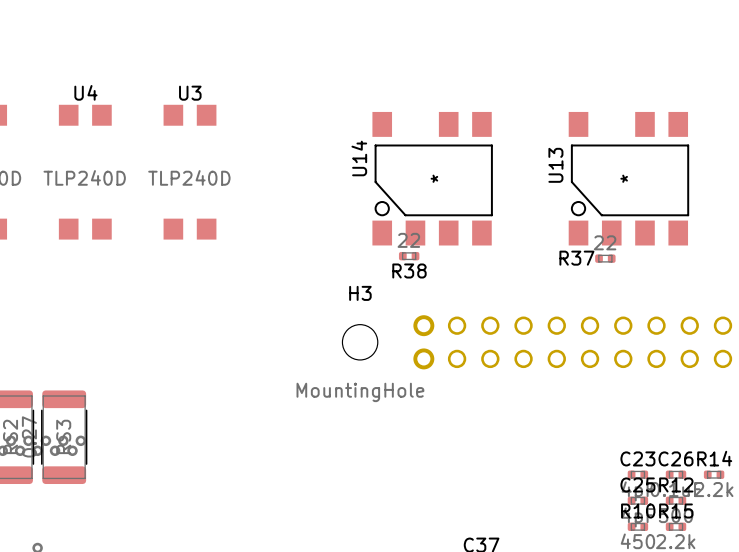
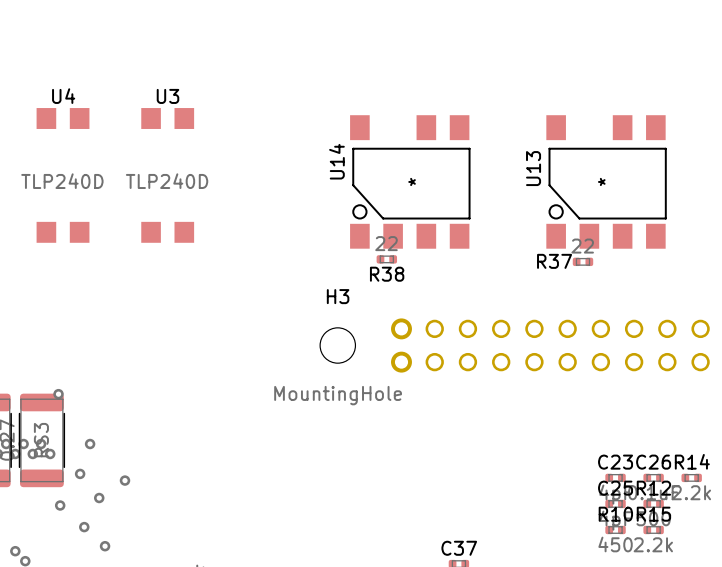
via: none -> (58, 394)
via: (80, 440) -> none
via: none -> (90, 444)
via: none -> (80, 473)
via: none -> (124, 480)
via: none -> (99, 498)
via: none -> (60, 505)
via: none -> (84, 527)
via: none -> (105, 546)

